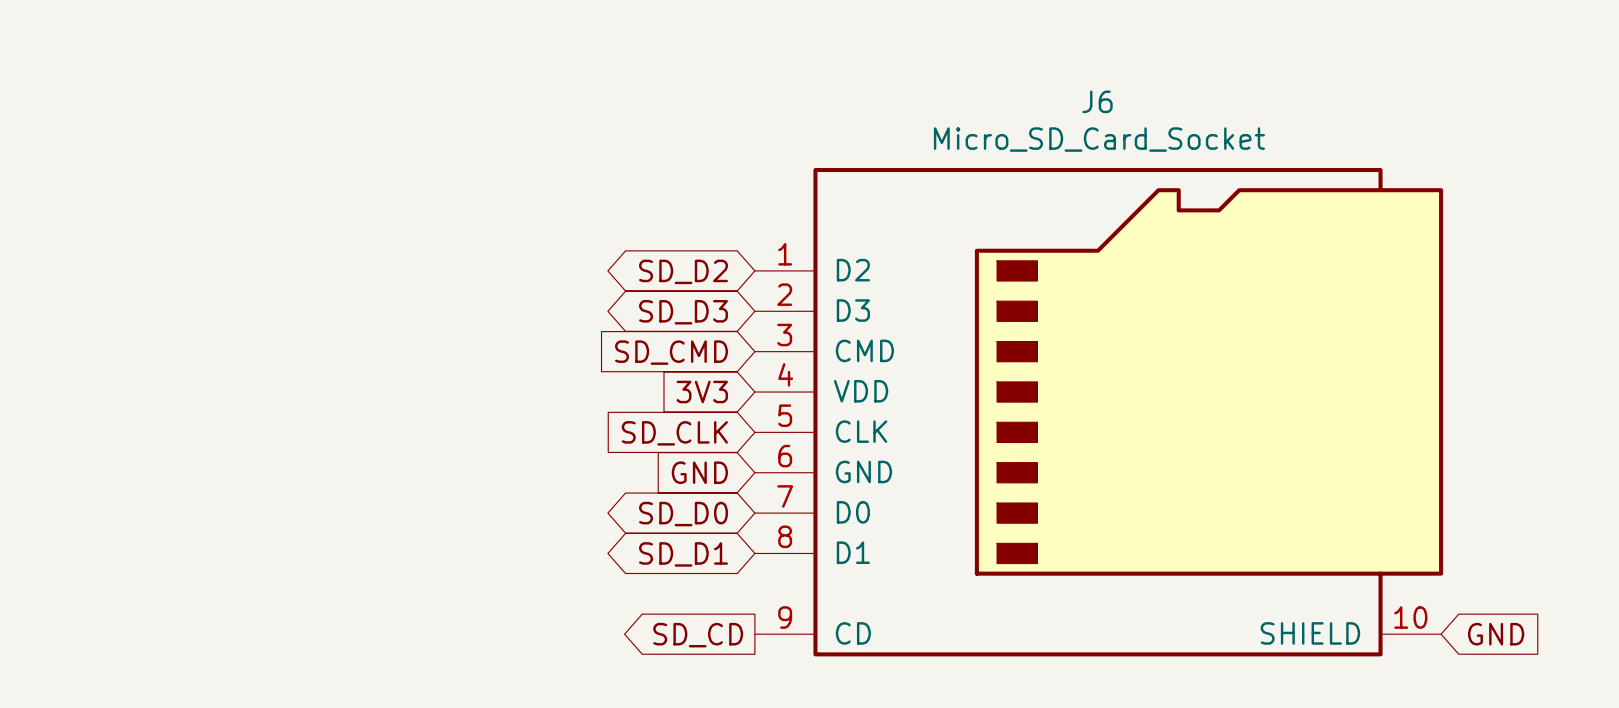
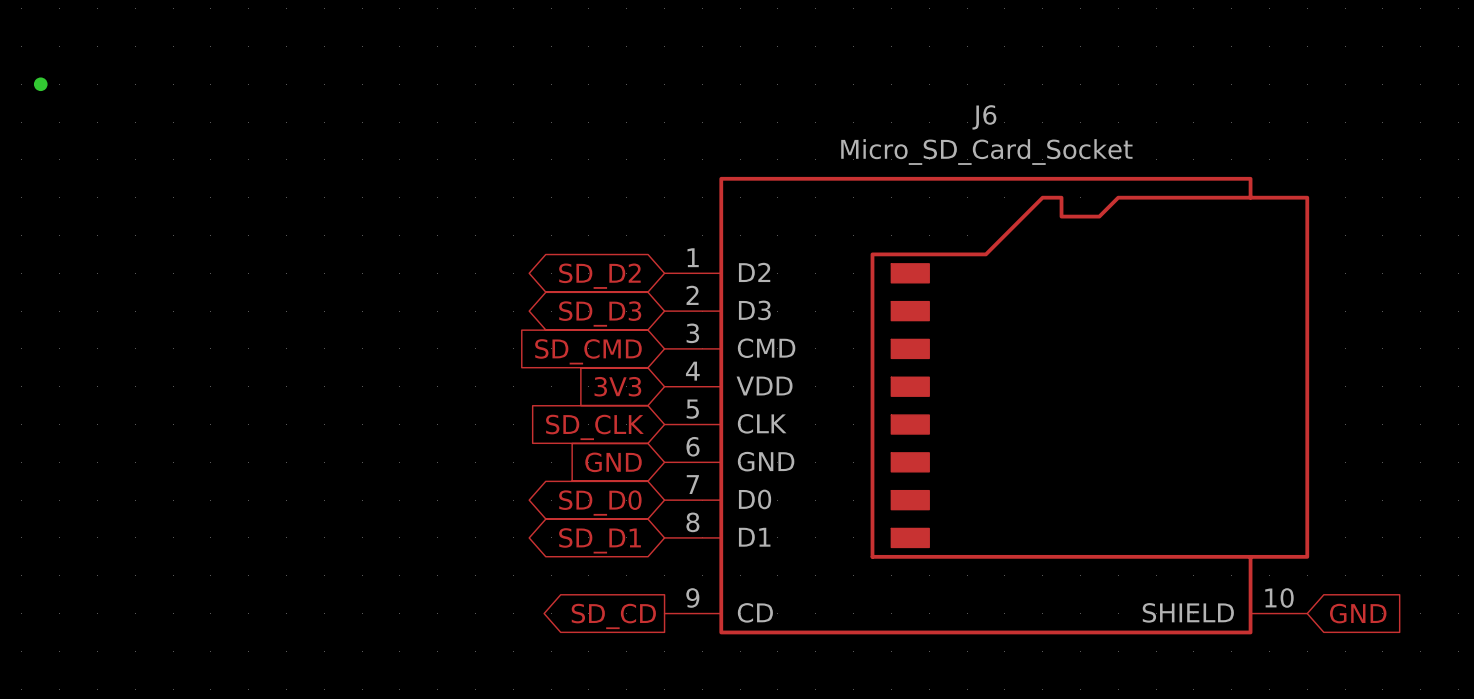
junction: none -> (40, 84)

